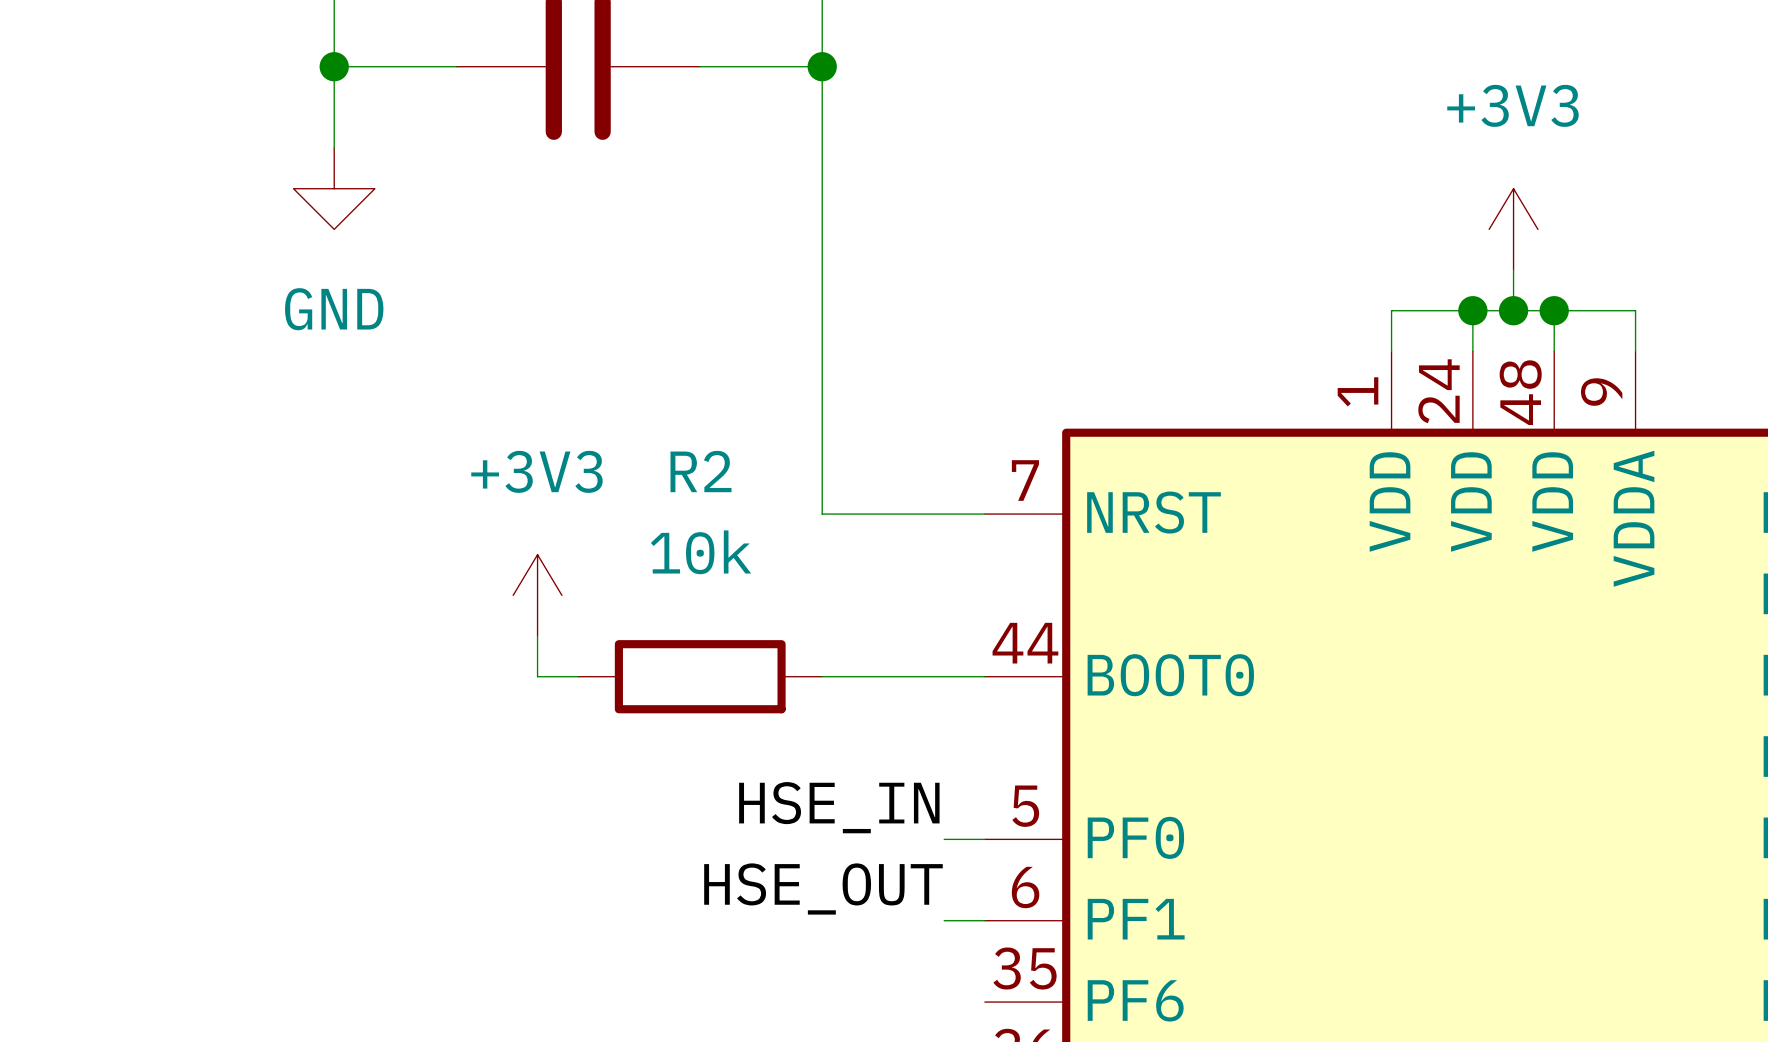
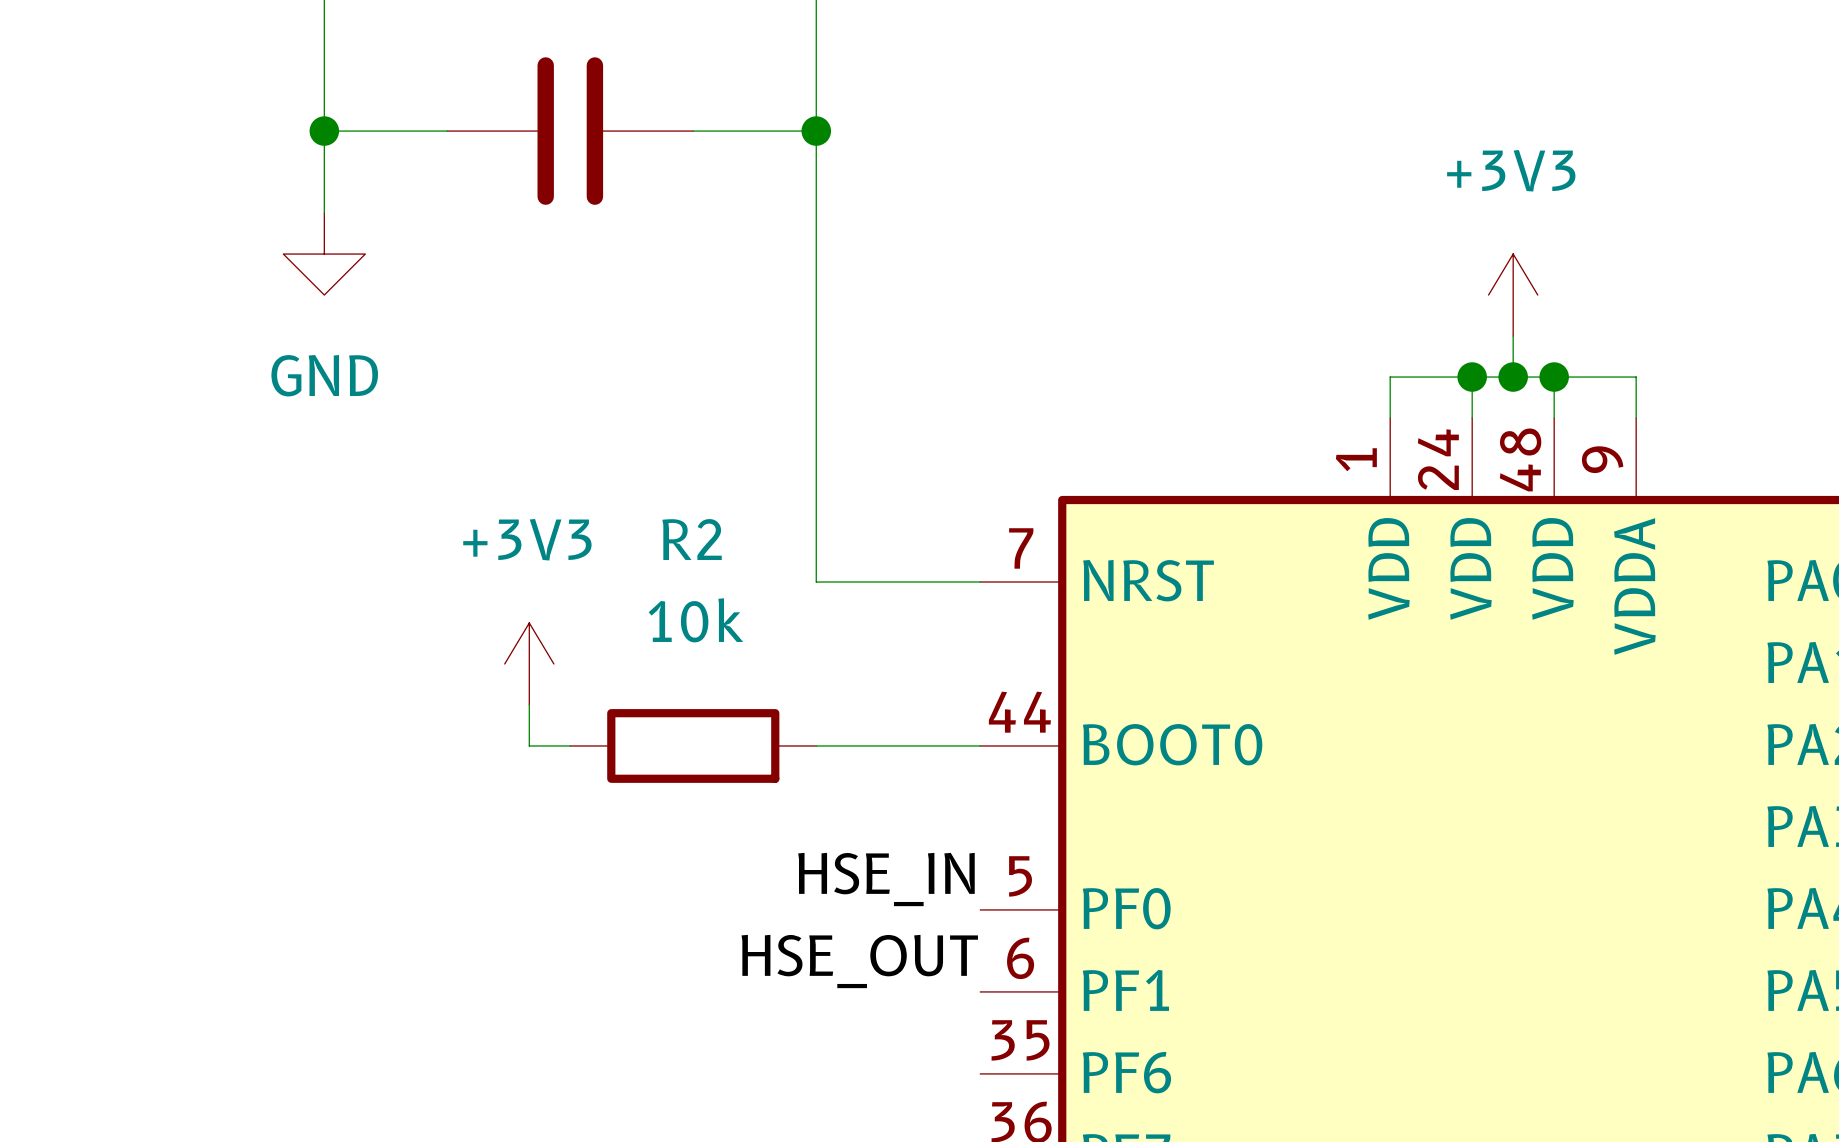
label position: HSE_IN (839, 807) -> HSE_IN (886, 879)
wire: (944, 839) (984, 839) -> none
label position: HSE_OUT (823, 889) -> HSE_OUT (859, 961)
wire: (944, 920) (984, 920) -> none

